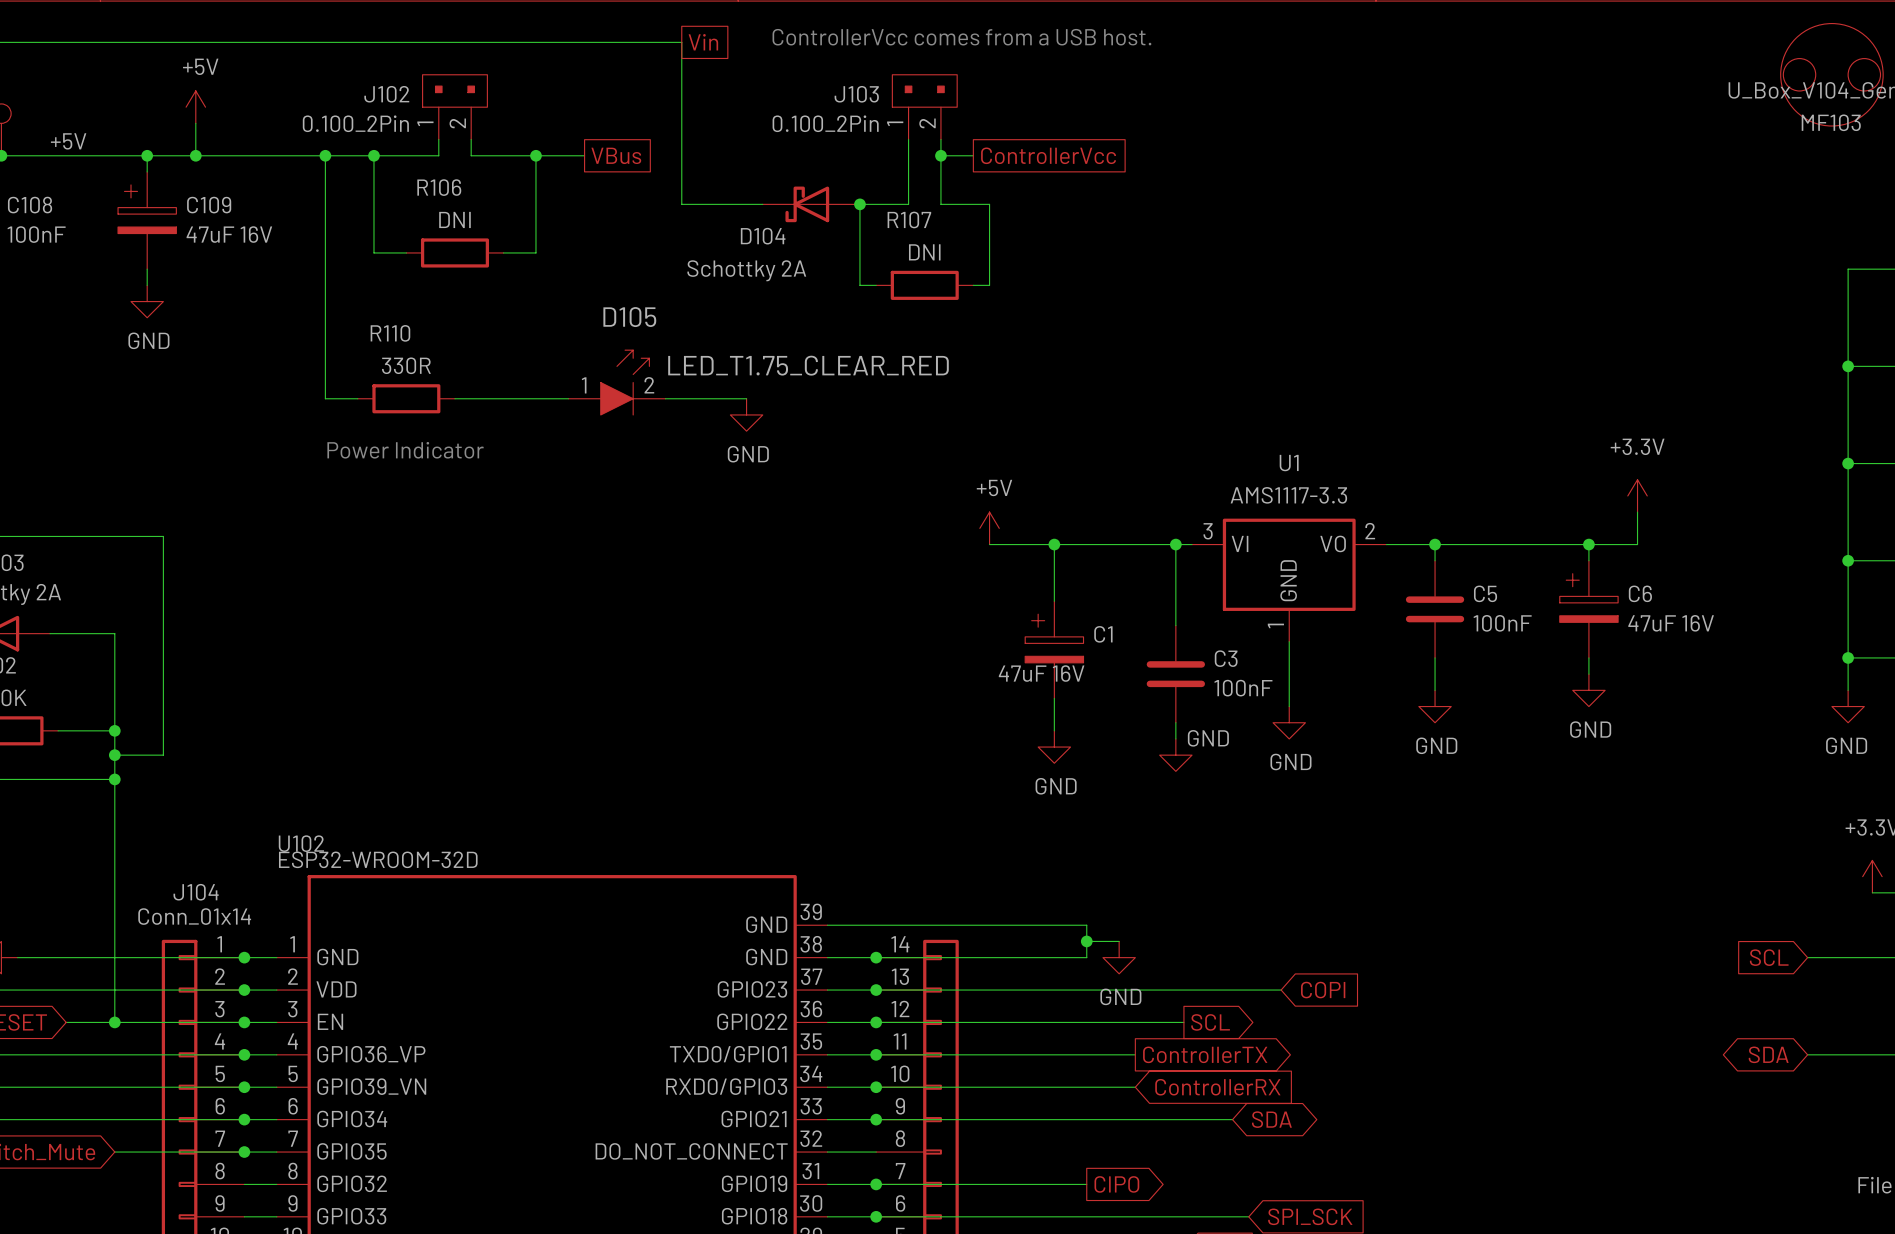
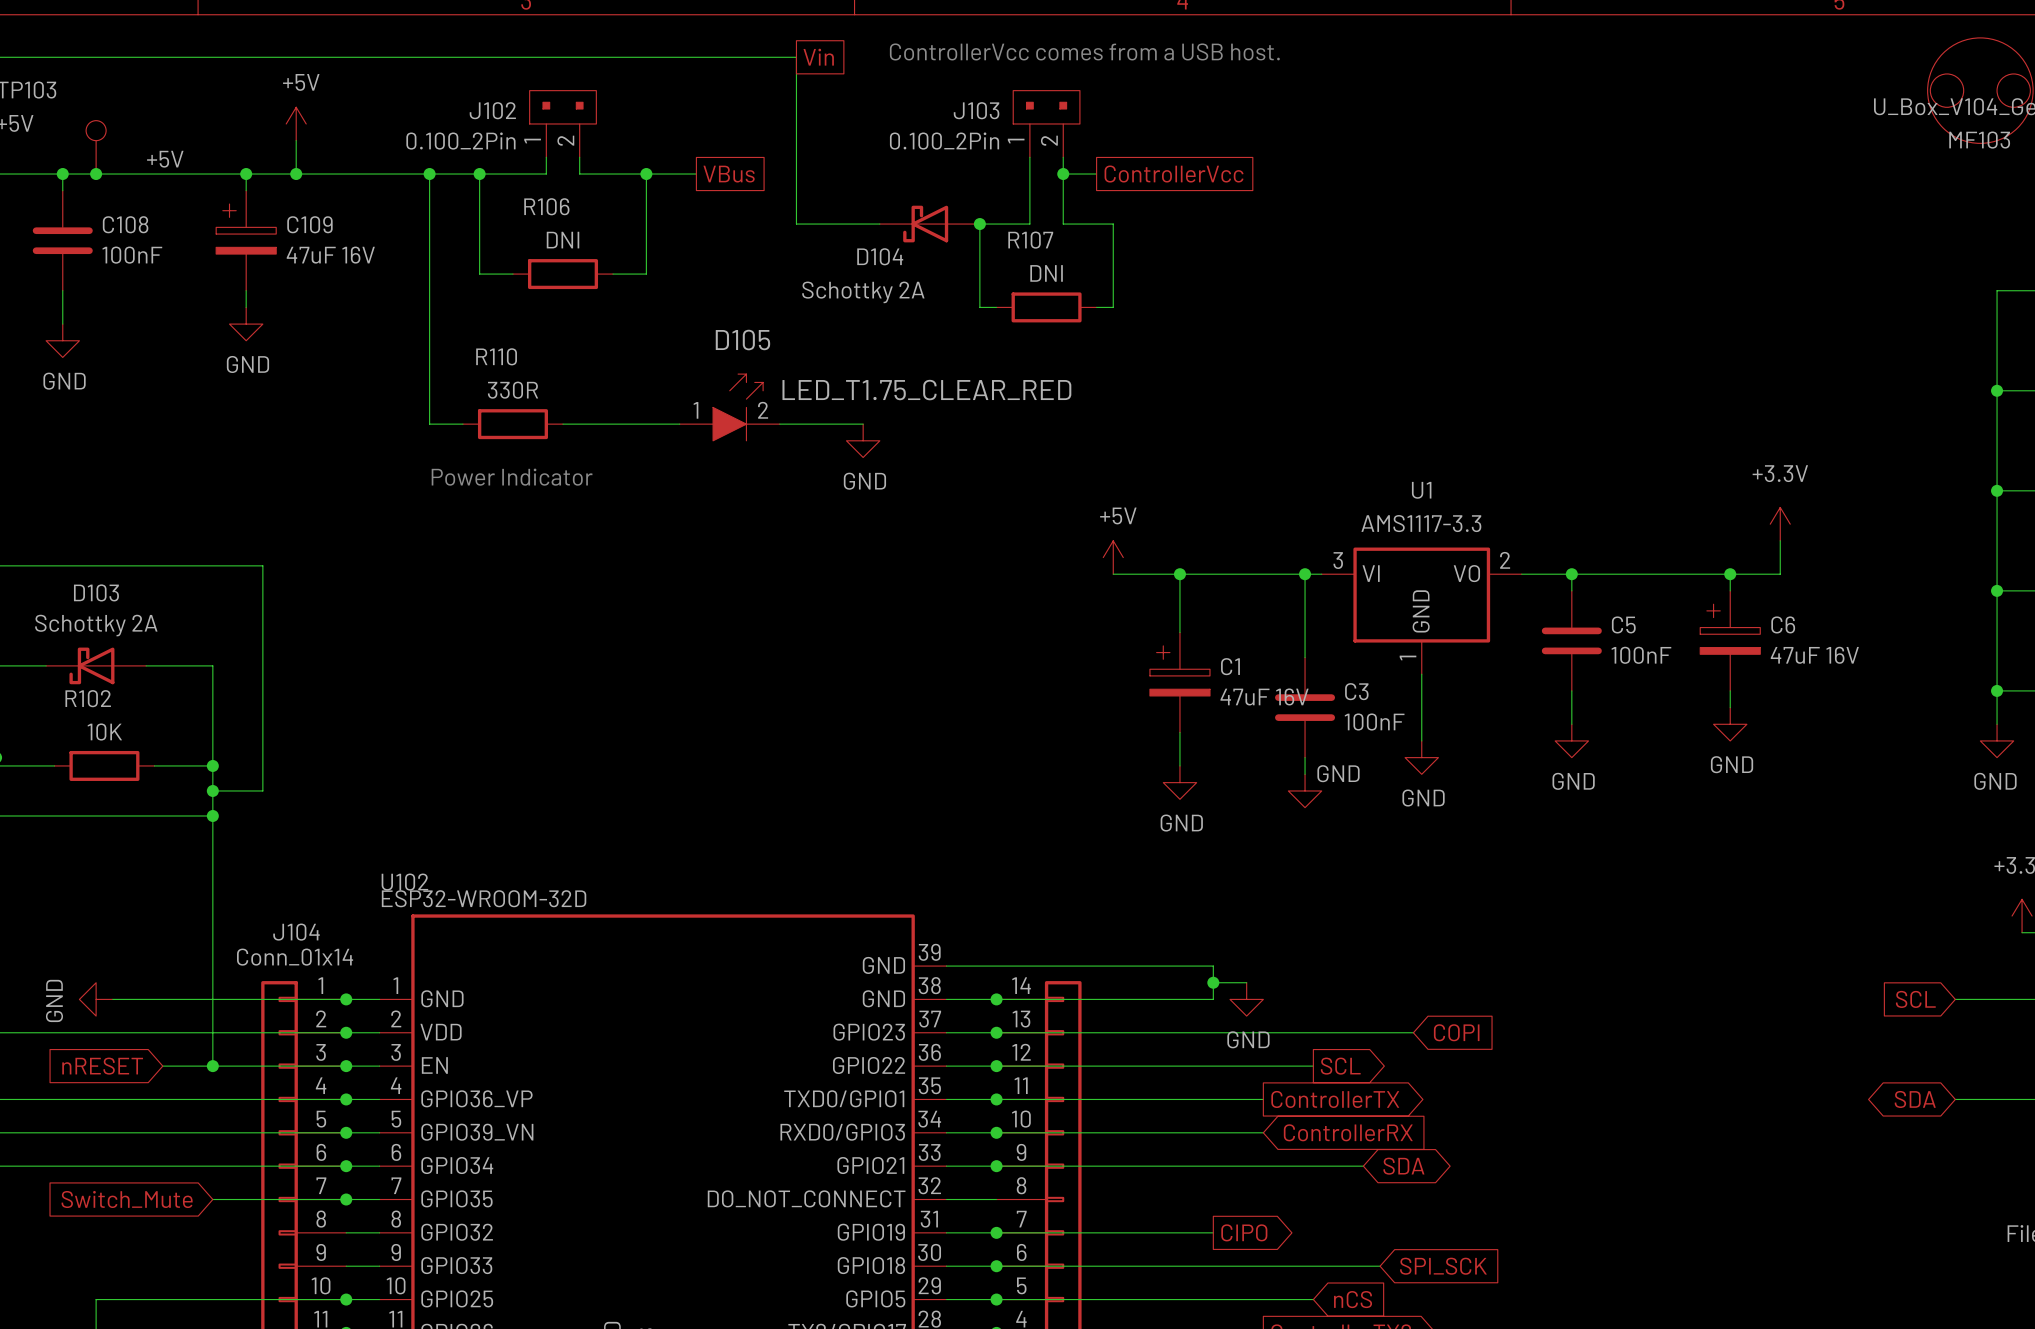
C1 value position: 47uF 16V (1041, 673) -> 47uF 16V (1264, 696)

